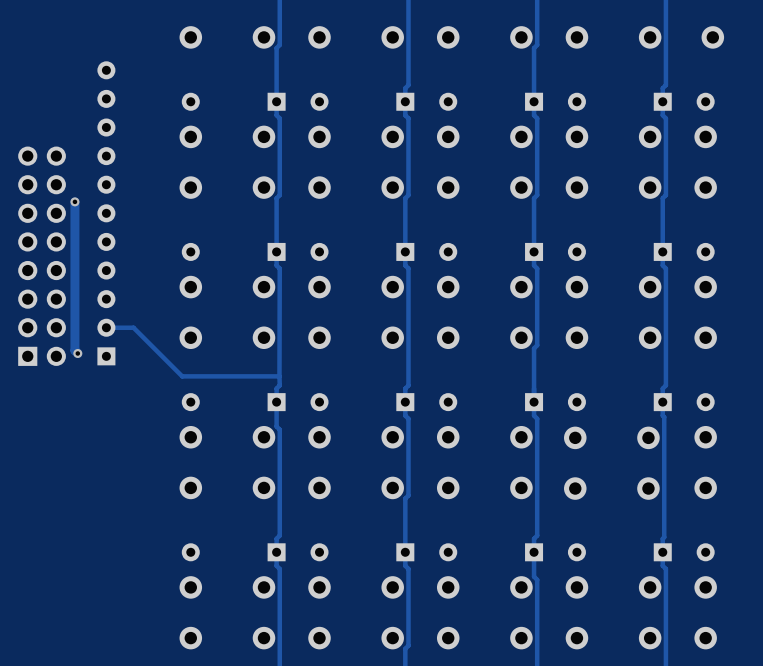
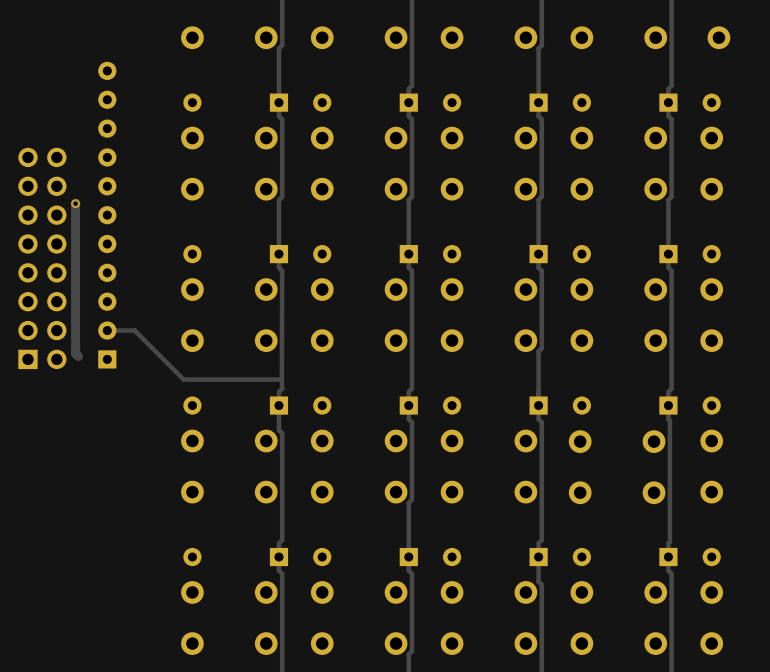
via: (77, 353) -> none

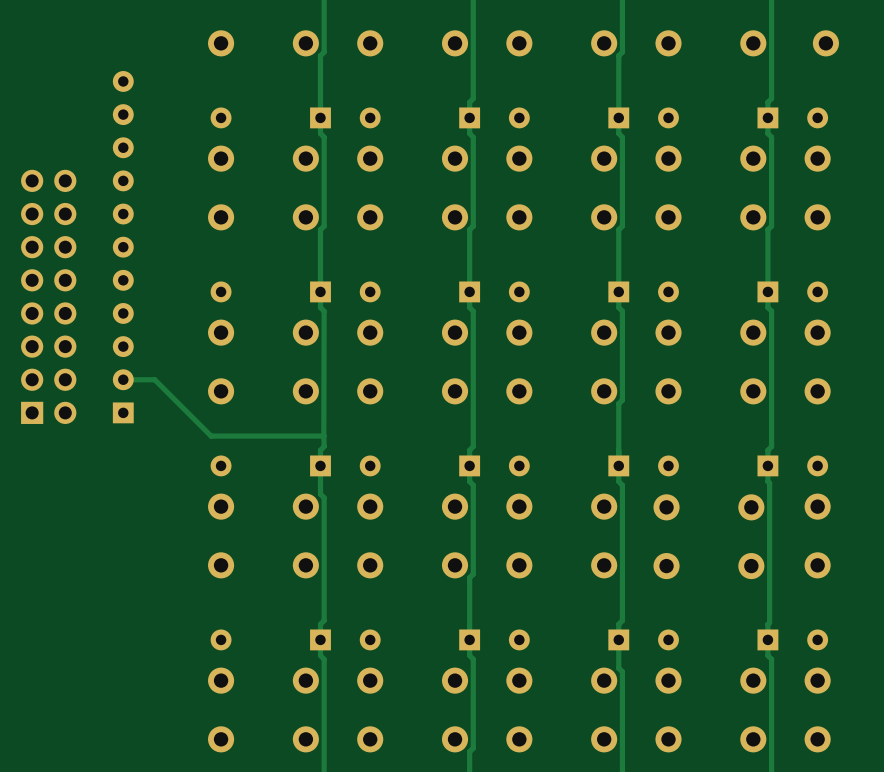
track: (75, 203) (75, 353) (78, 356) -> none
via: (75, 203) -> none

